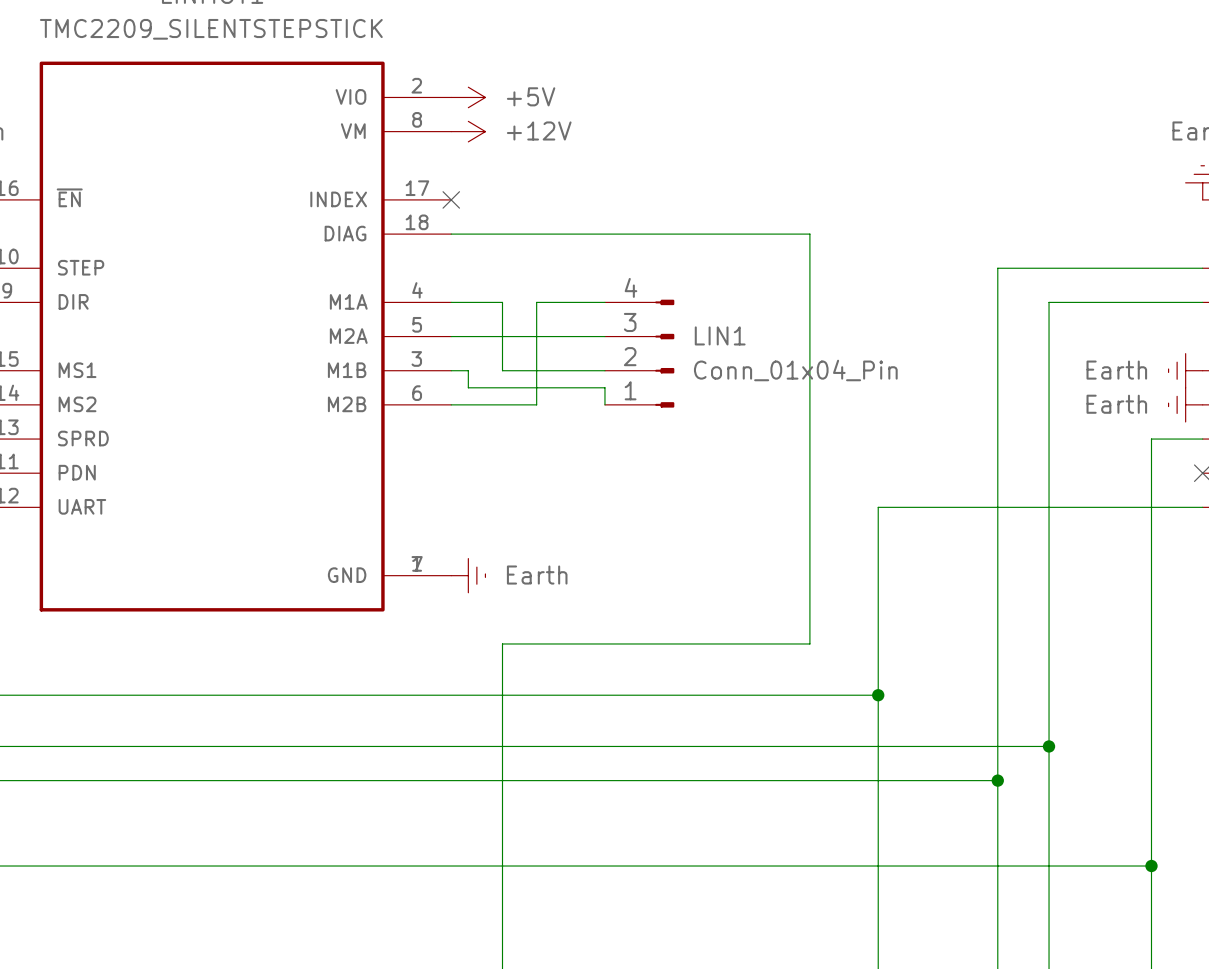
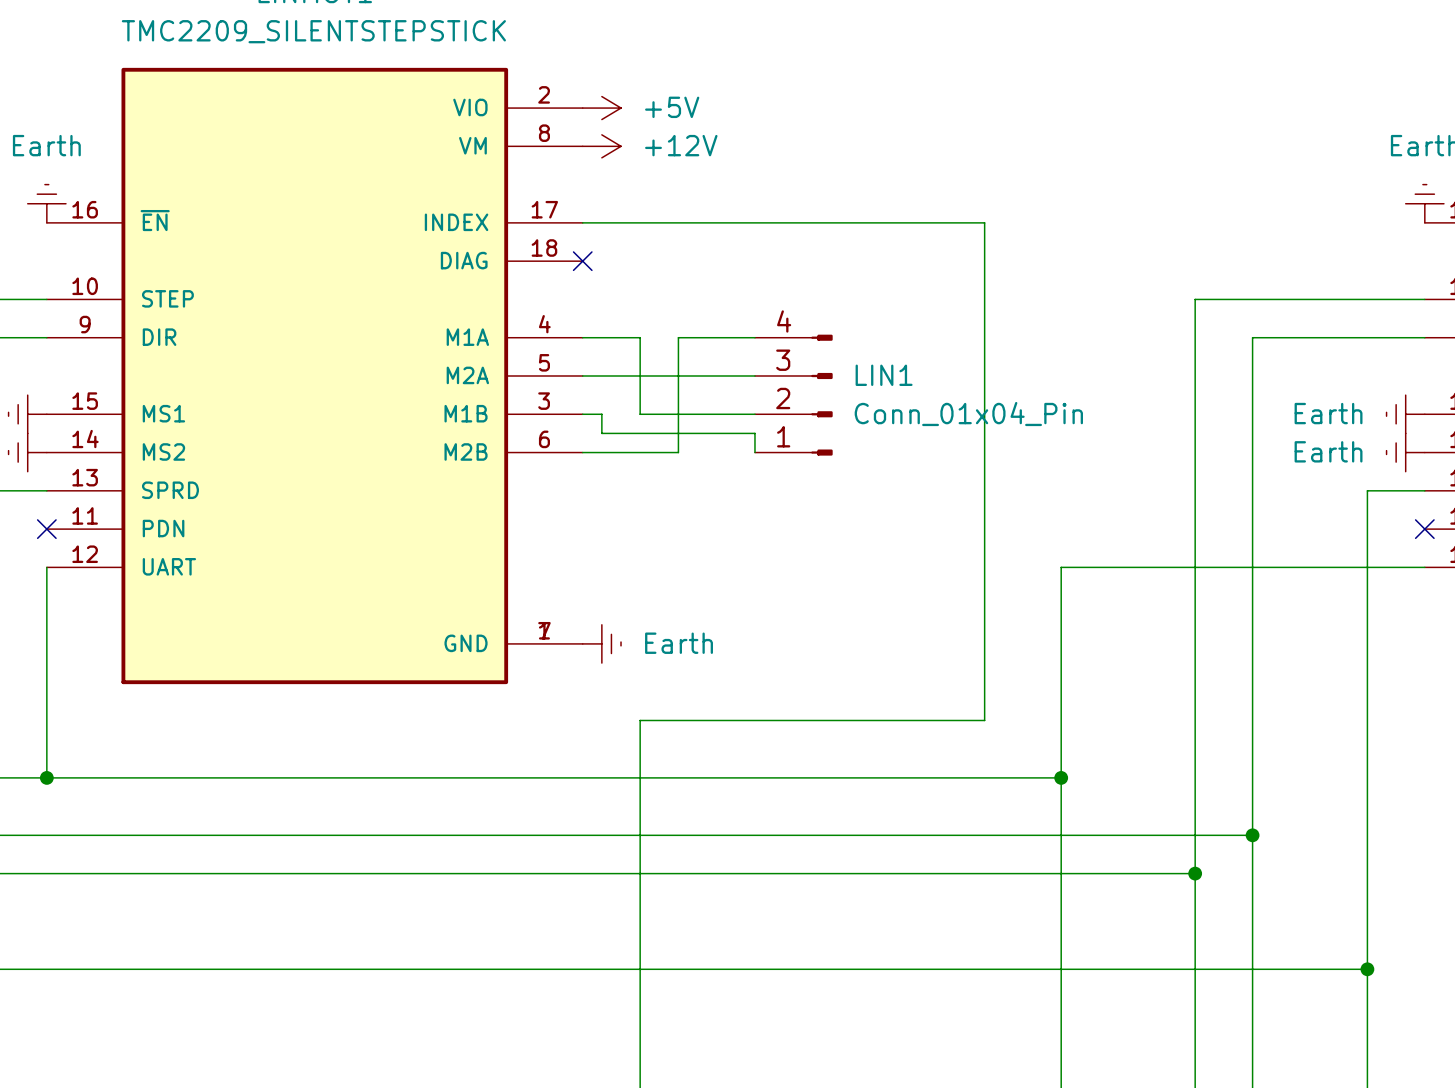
no-connect mark position: (451, 199) -> (582, 261)
wire: (451, 234) (809, 234) -> (582, 222) (984, 222) (984, 261)

